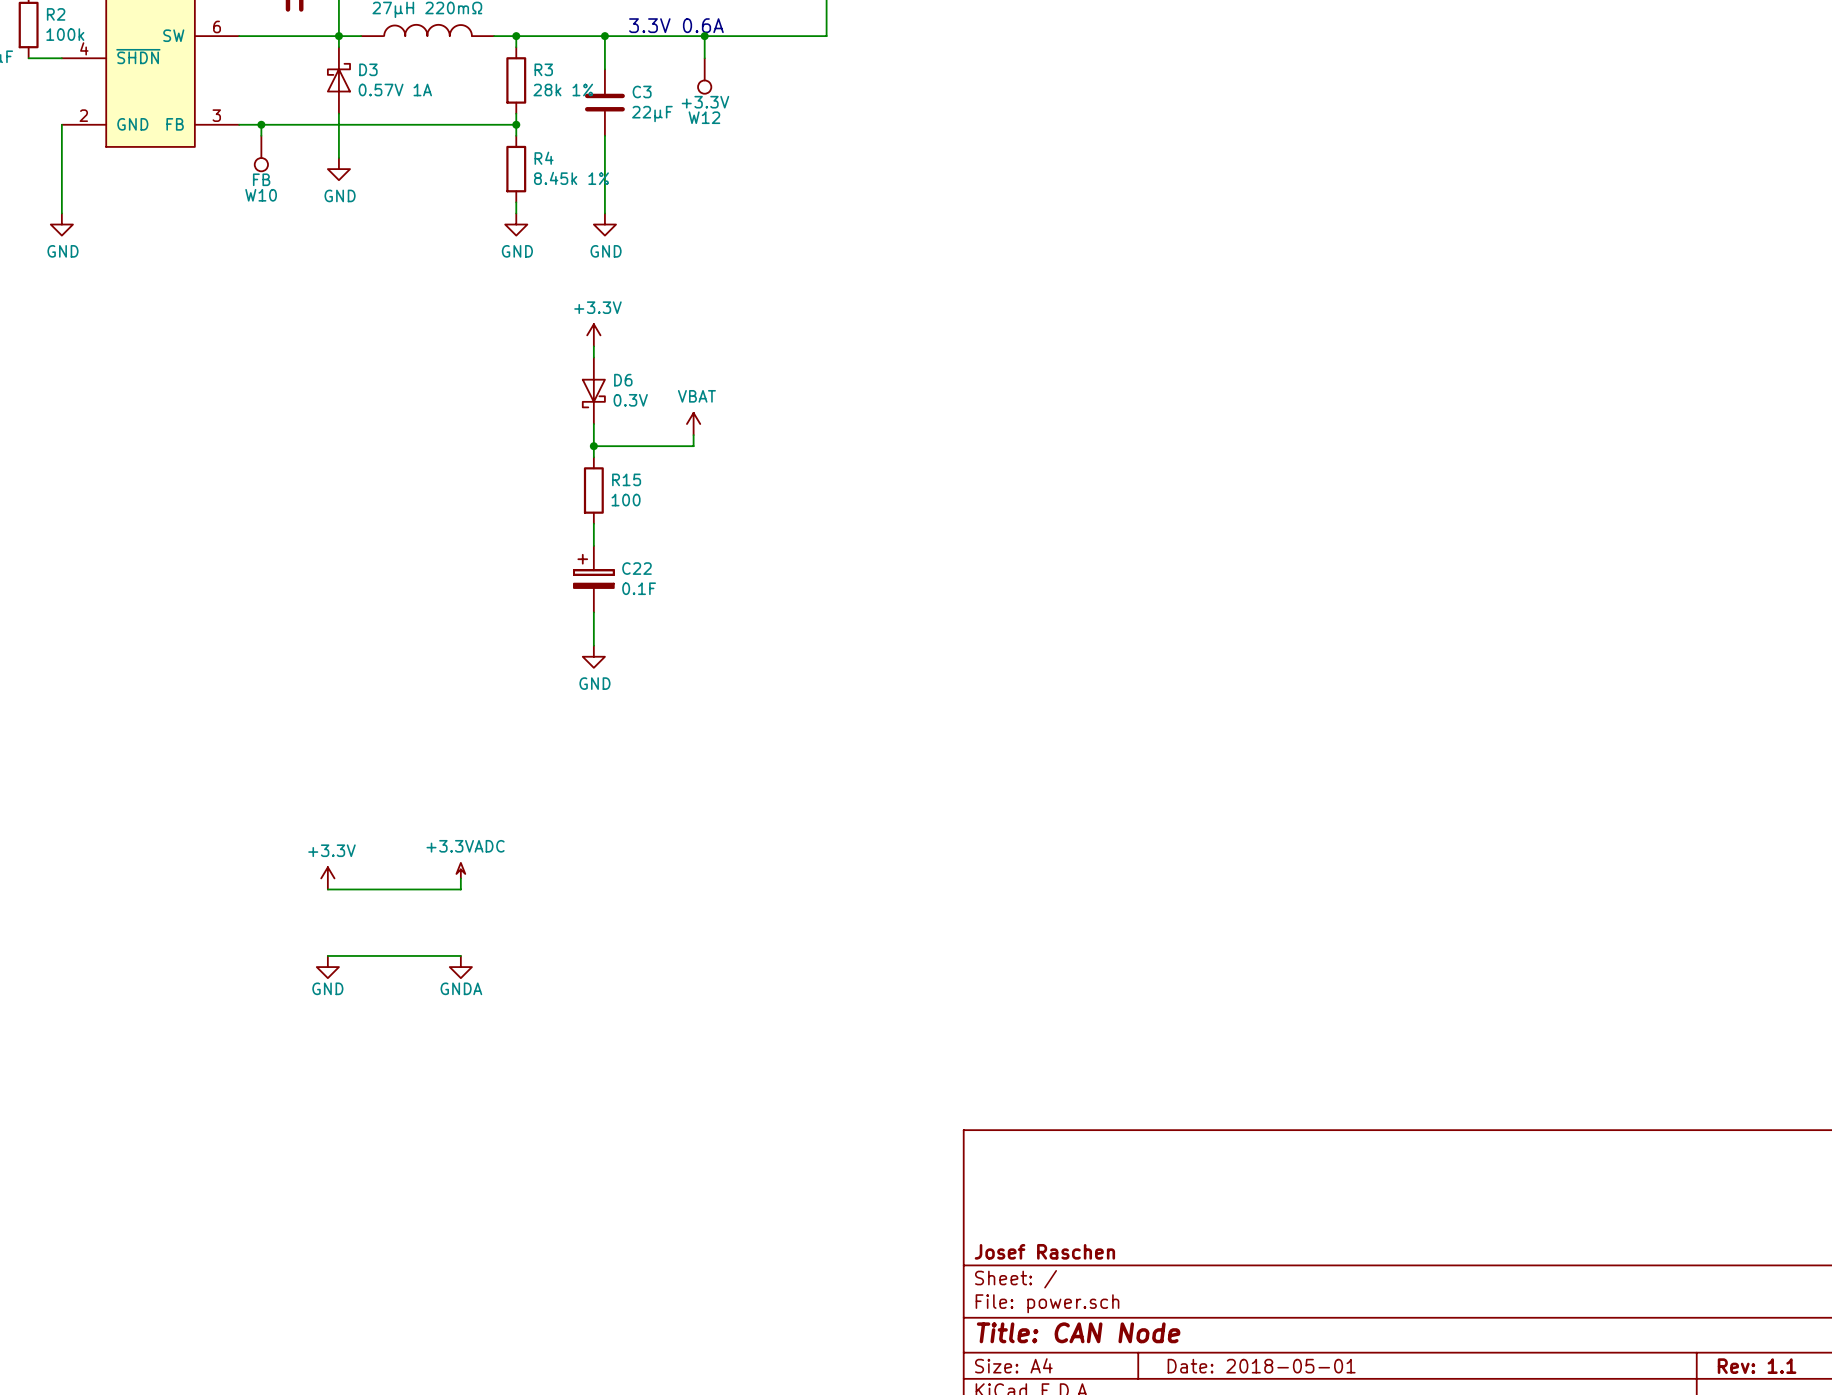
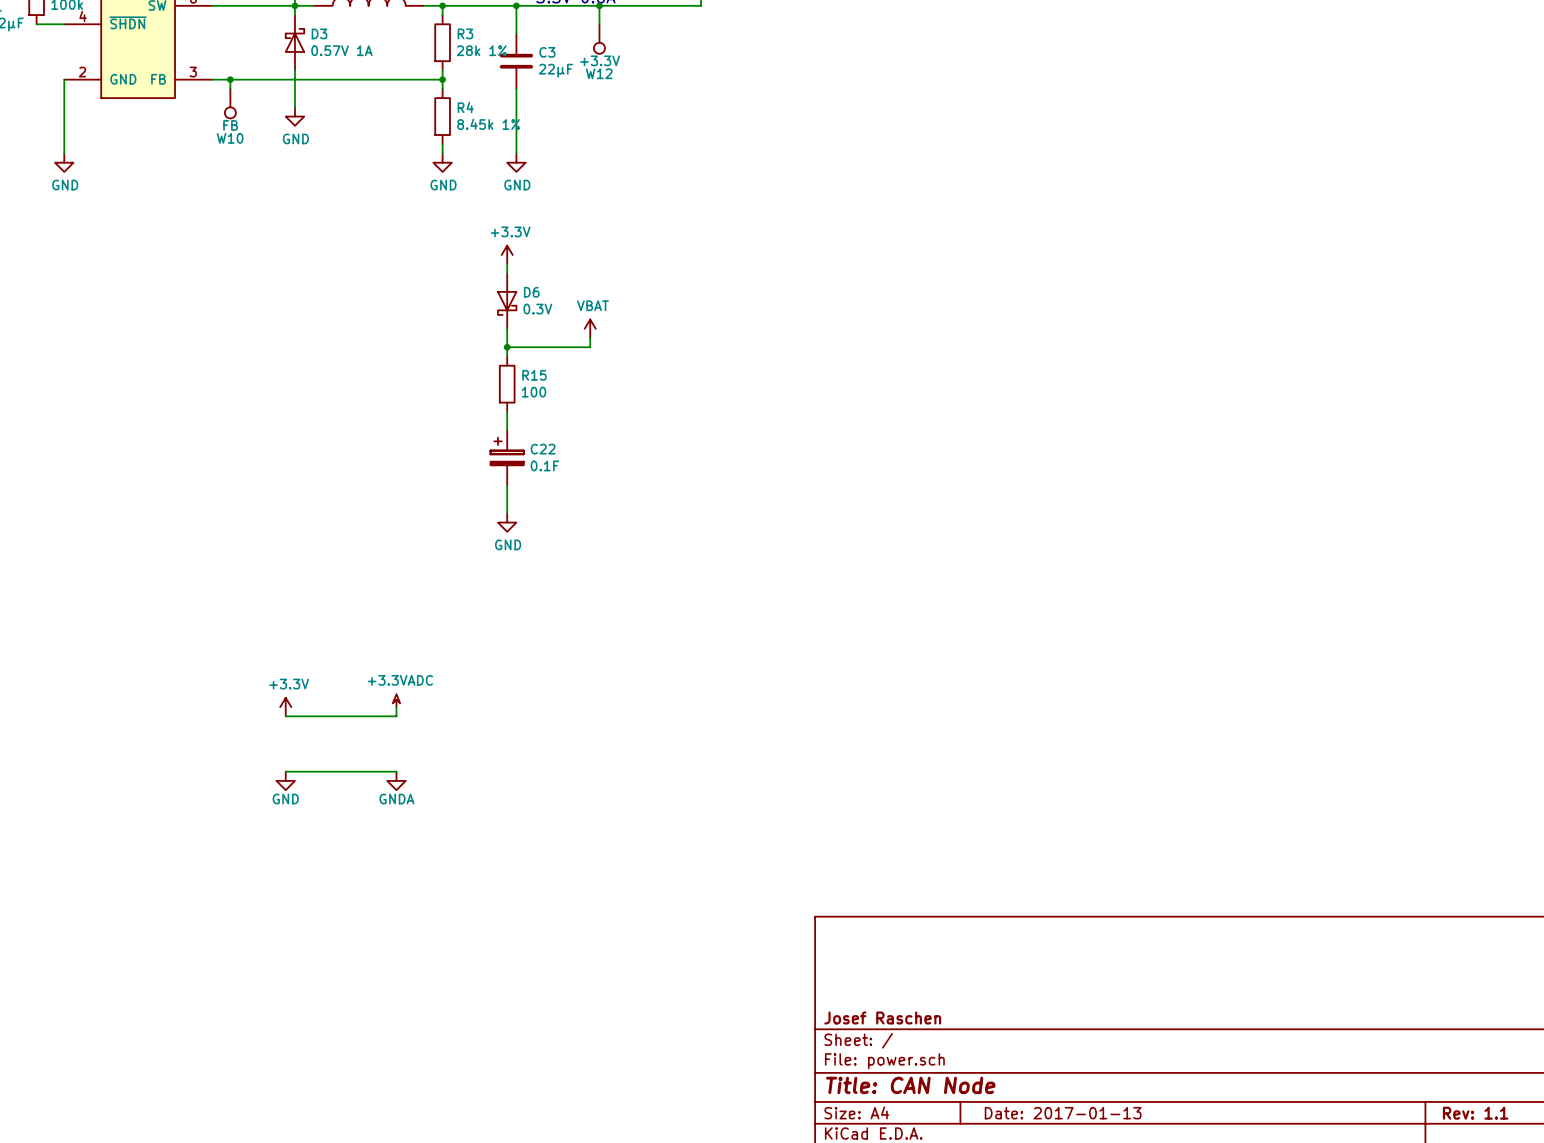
title block: Date: 2018-05-01 (1261, 1366) -> Date: 2017-01-13 (1063, 1113)

